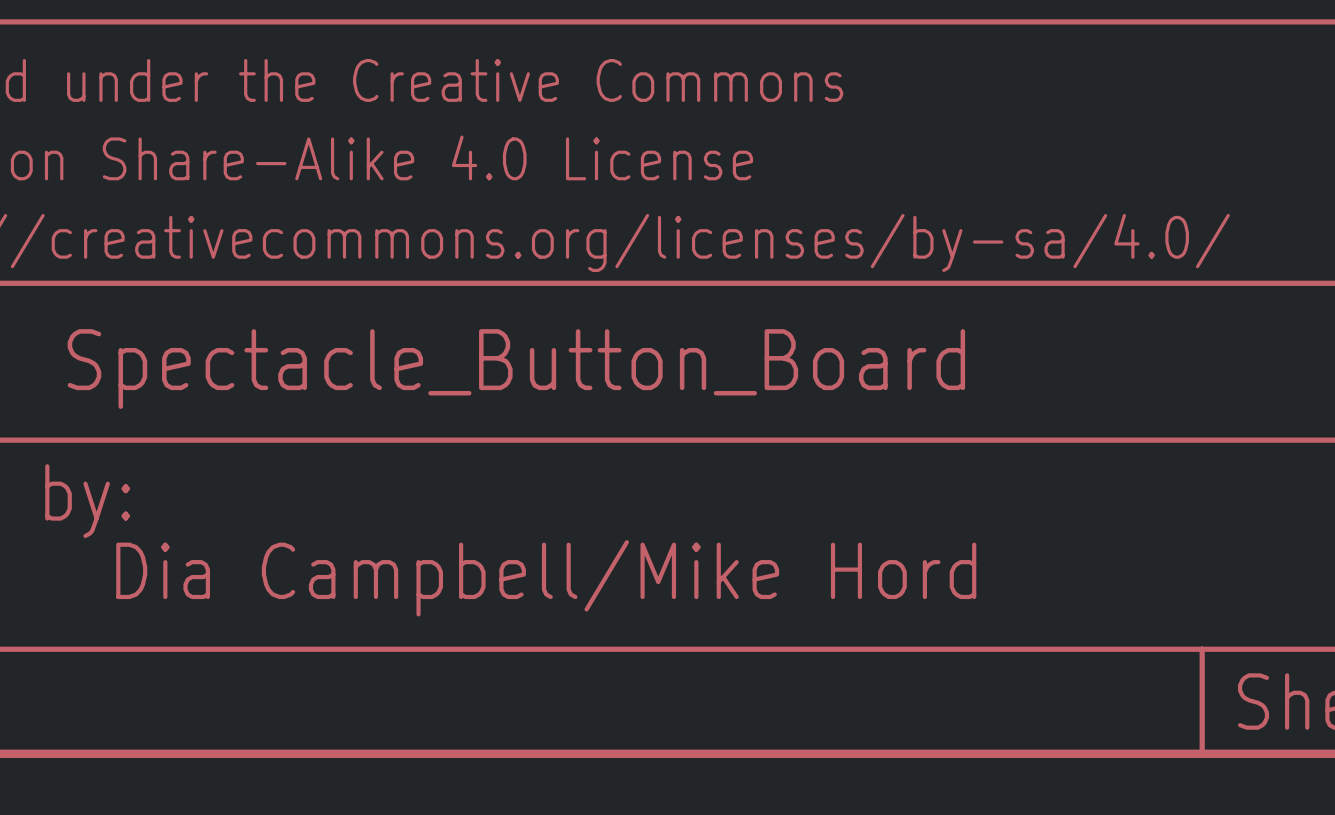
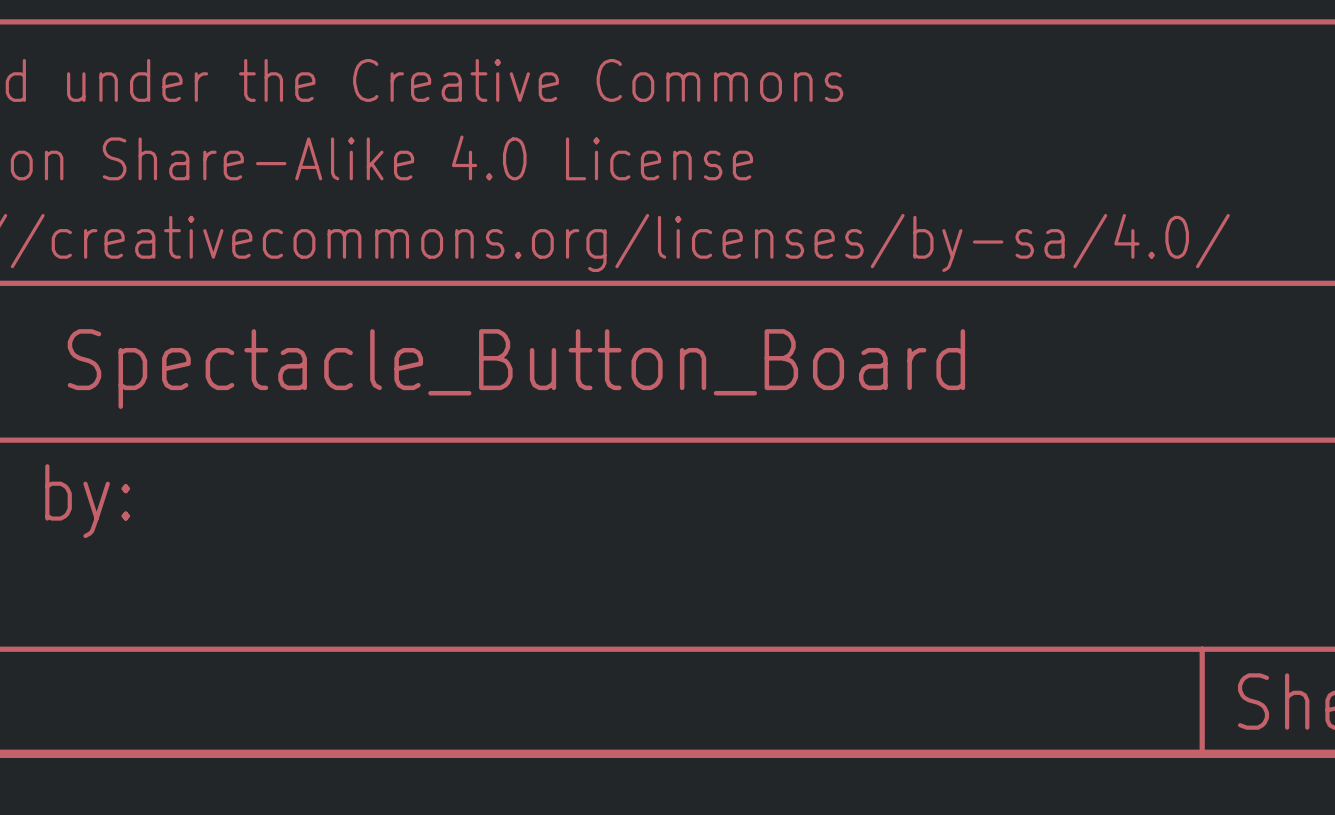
text: Dia Campbell/Mike Hord (546, 578) -> none

